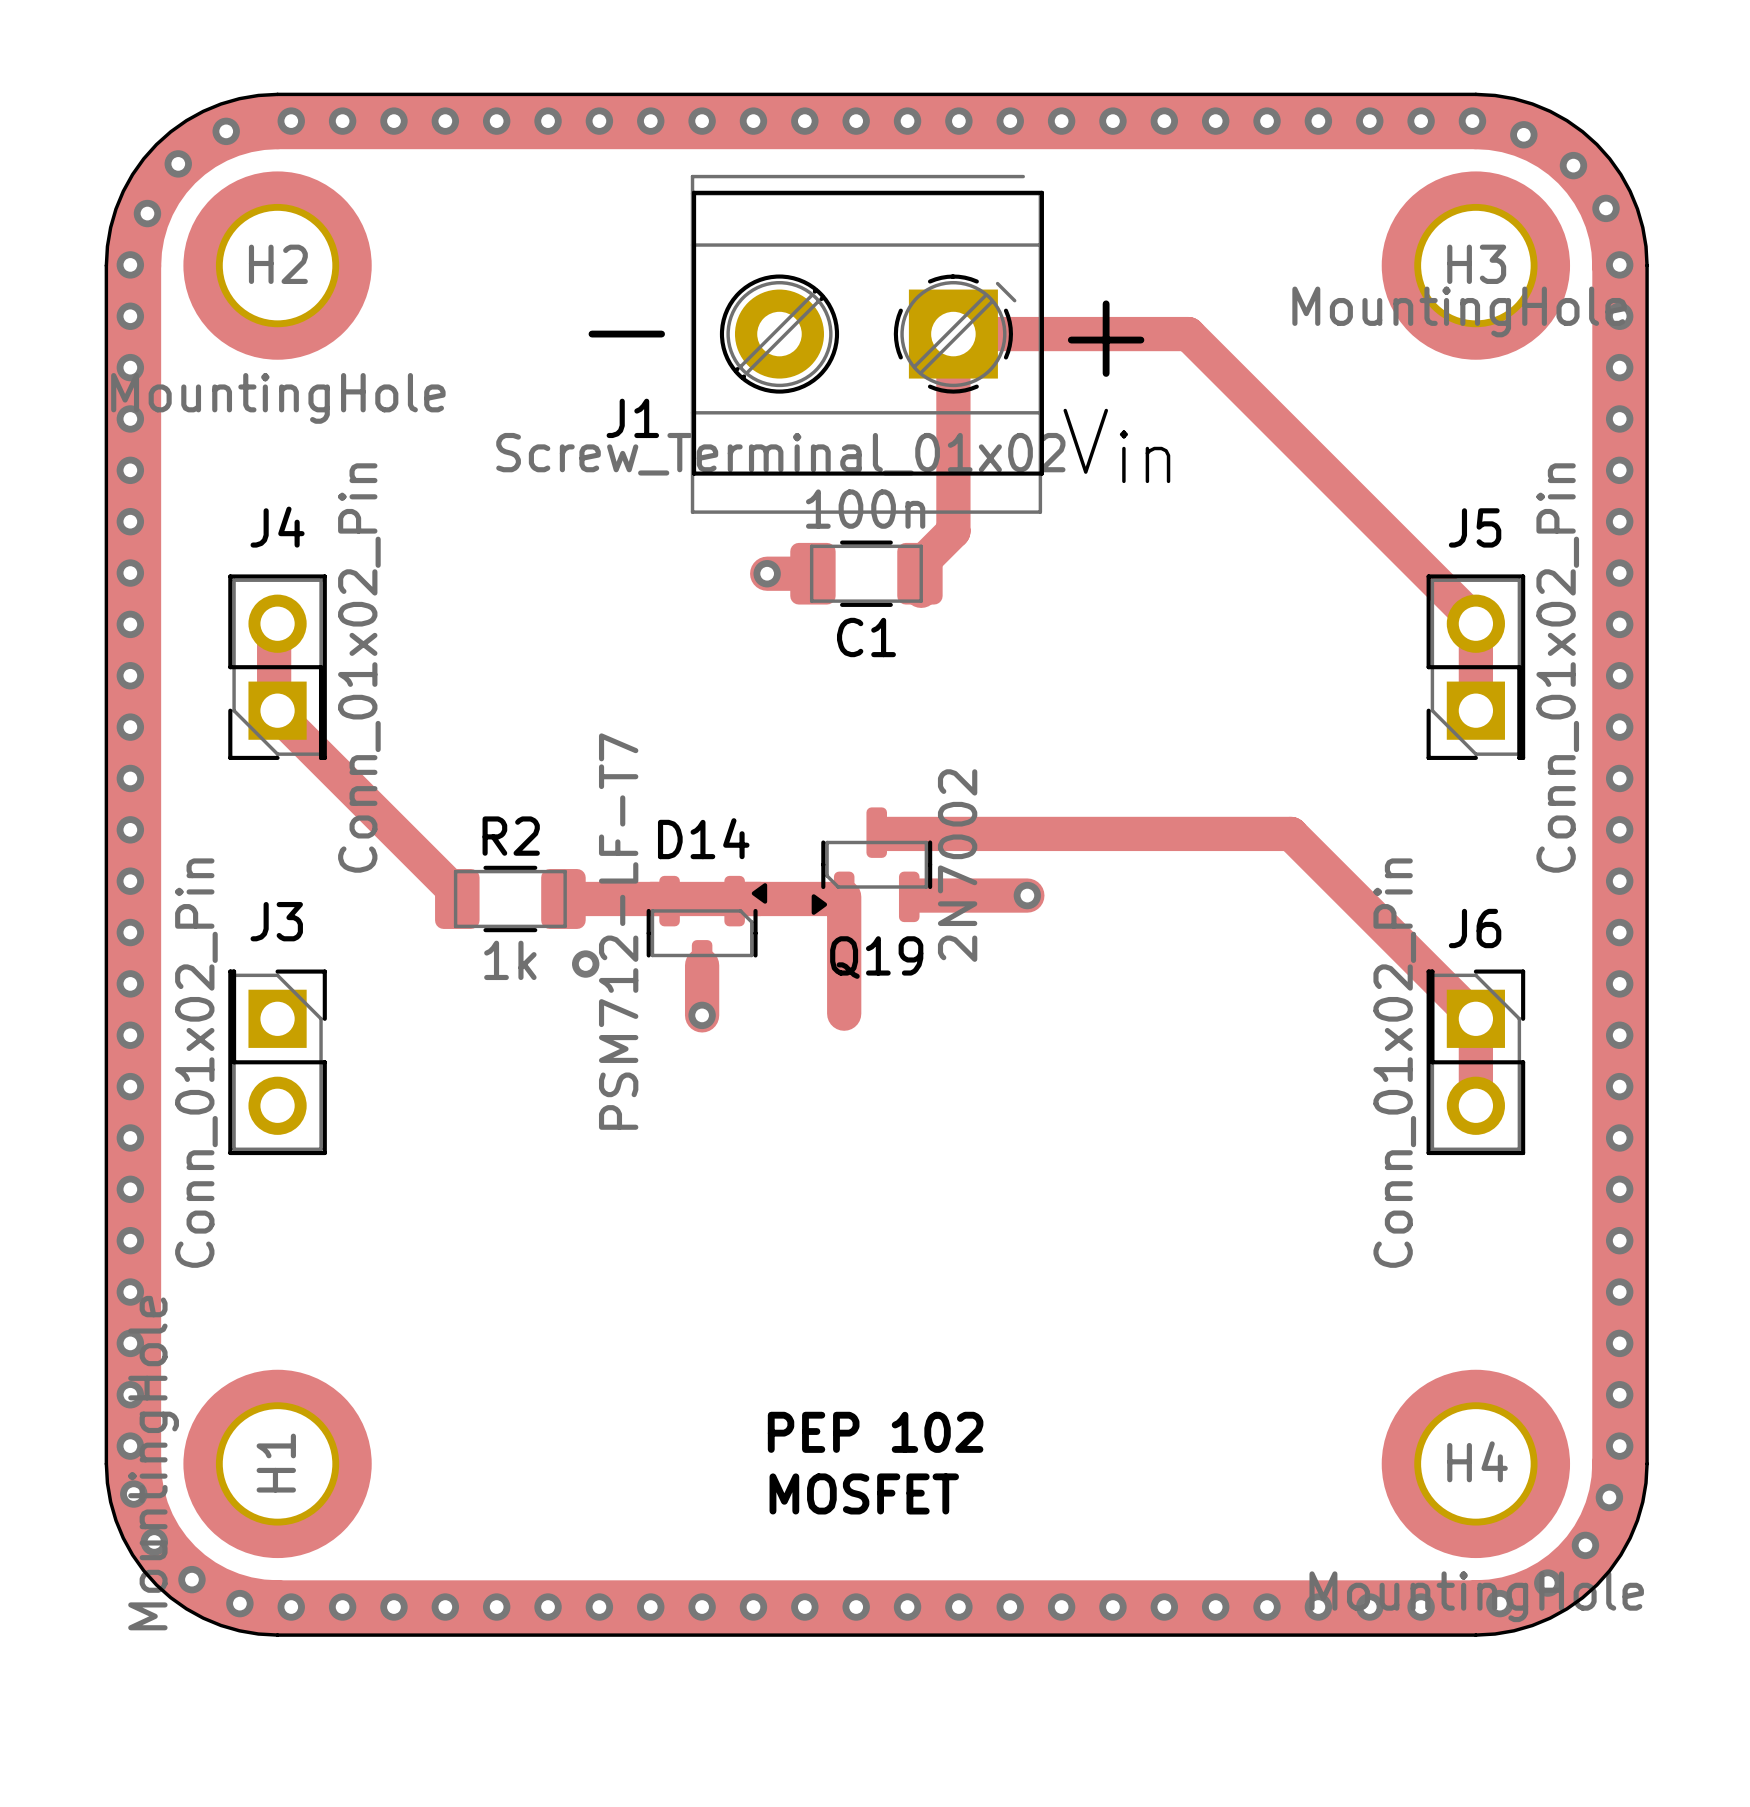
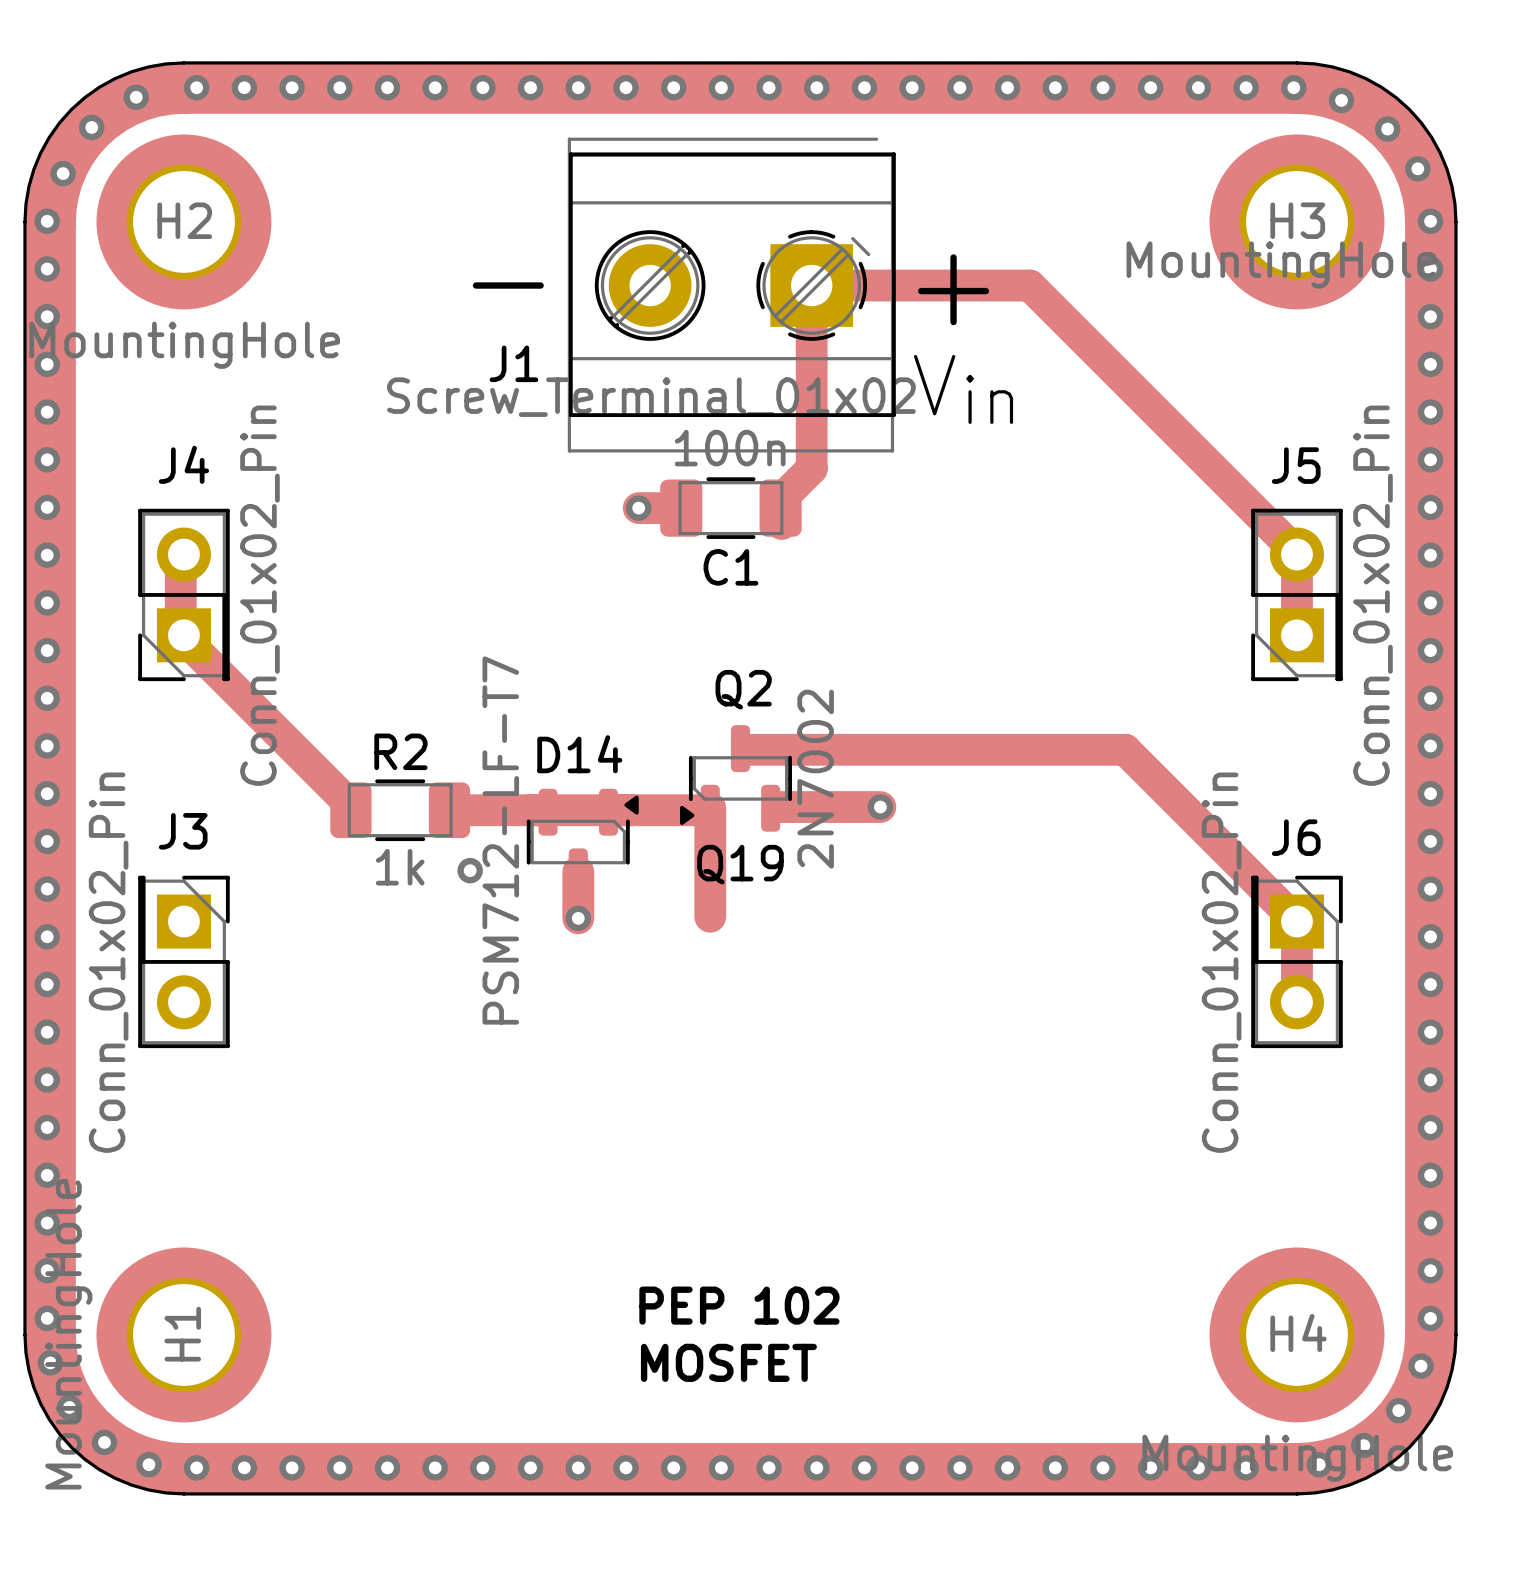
text: none -> Q2 (743, 689)

